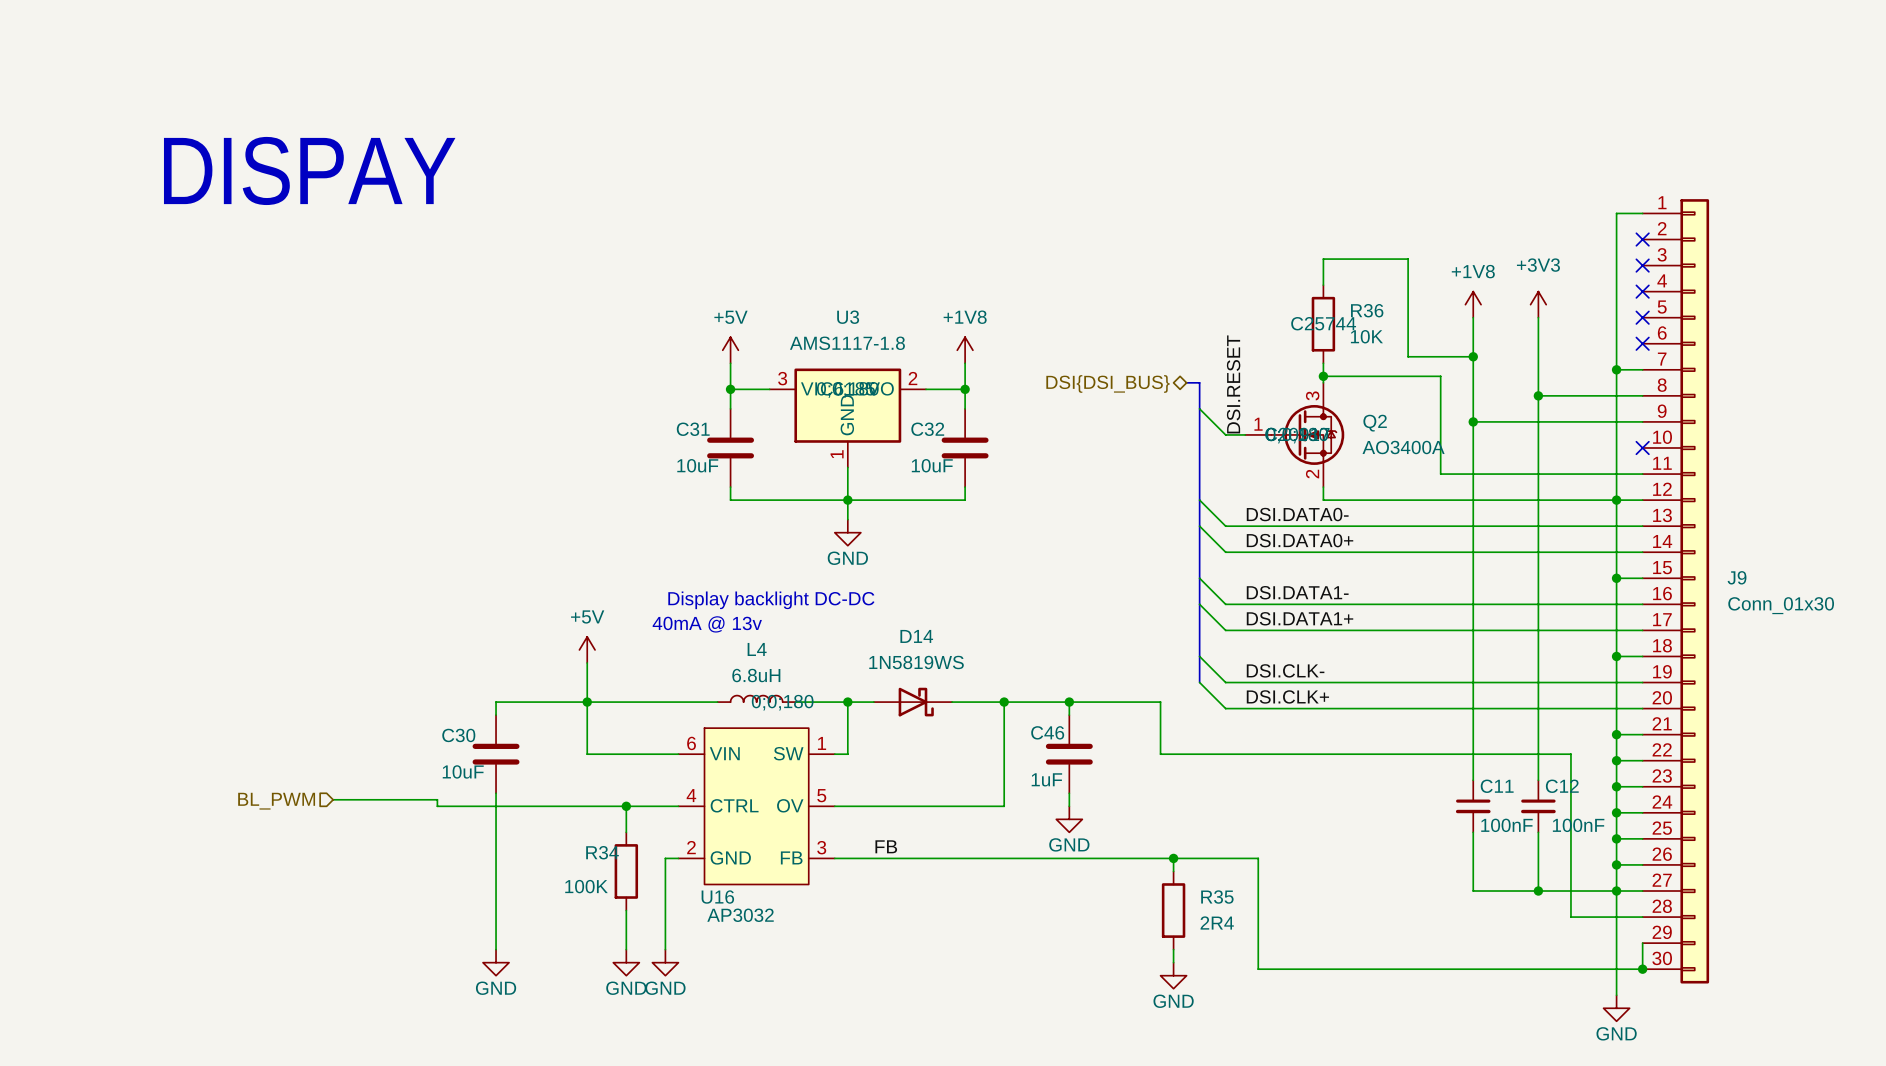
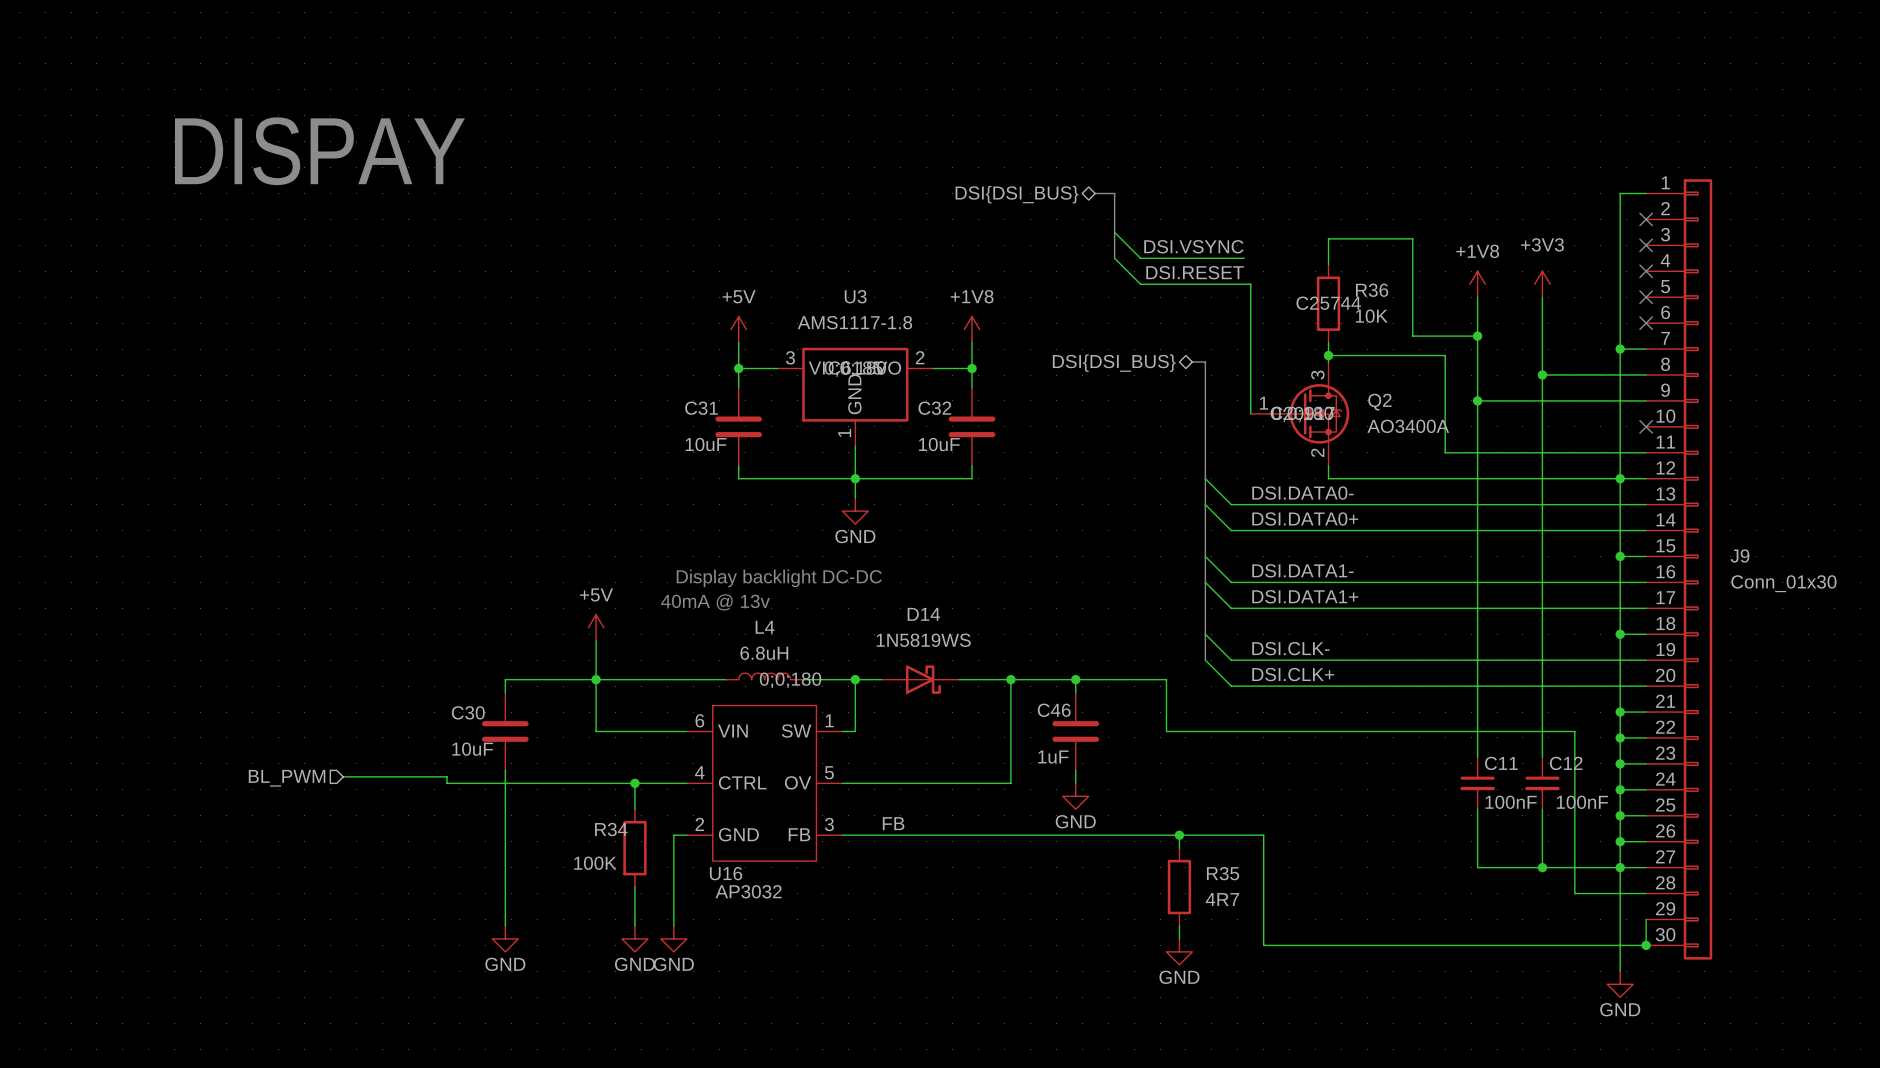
bus: none -> (1095, 193) (1114, 193) (1114, 258)
hierarchical label: none -> DSI{DSI_BUS} (1017, 194)
wire: none -> (1114, 232) (1140, 258) (1244, 258)
label: none -> DSI.VSYNC (1193, 246)
label rotation: 0° (1233, 384) -> 90° clockwise (1195, 272)
wire: (1199, 408) (1225, 434) (1245, 434) -> (1114, 258) (1140, 284) (1250, 284) (1250, 413)
R35 value: 2R4 (1217, 922) -> 4R7 (1222, 899)

